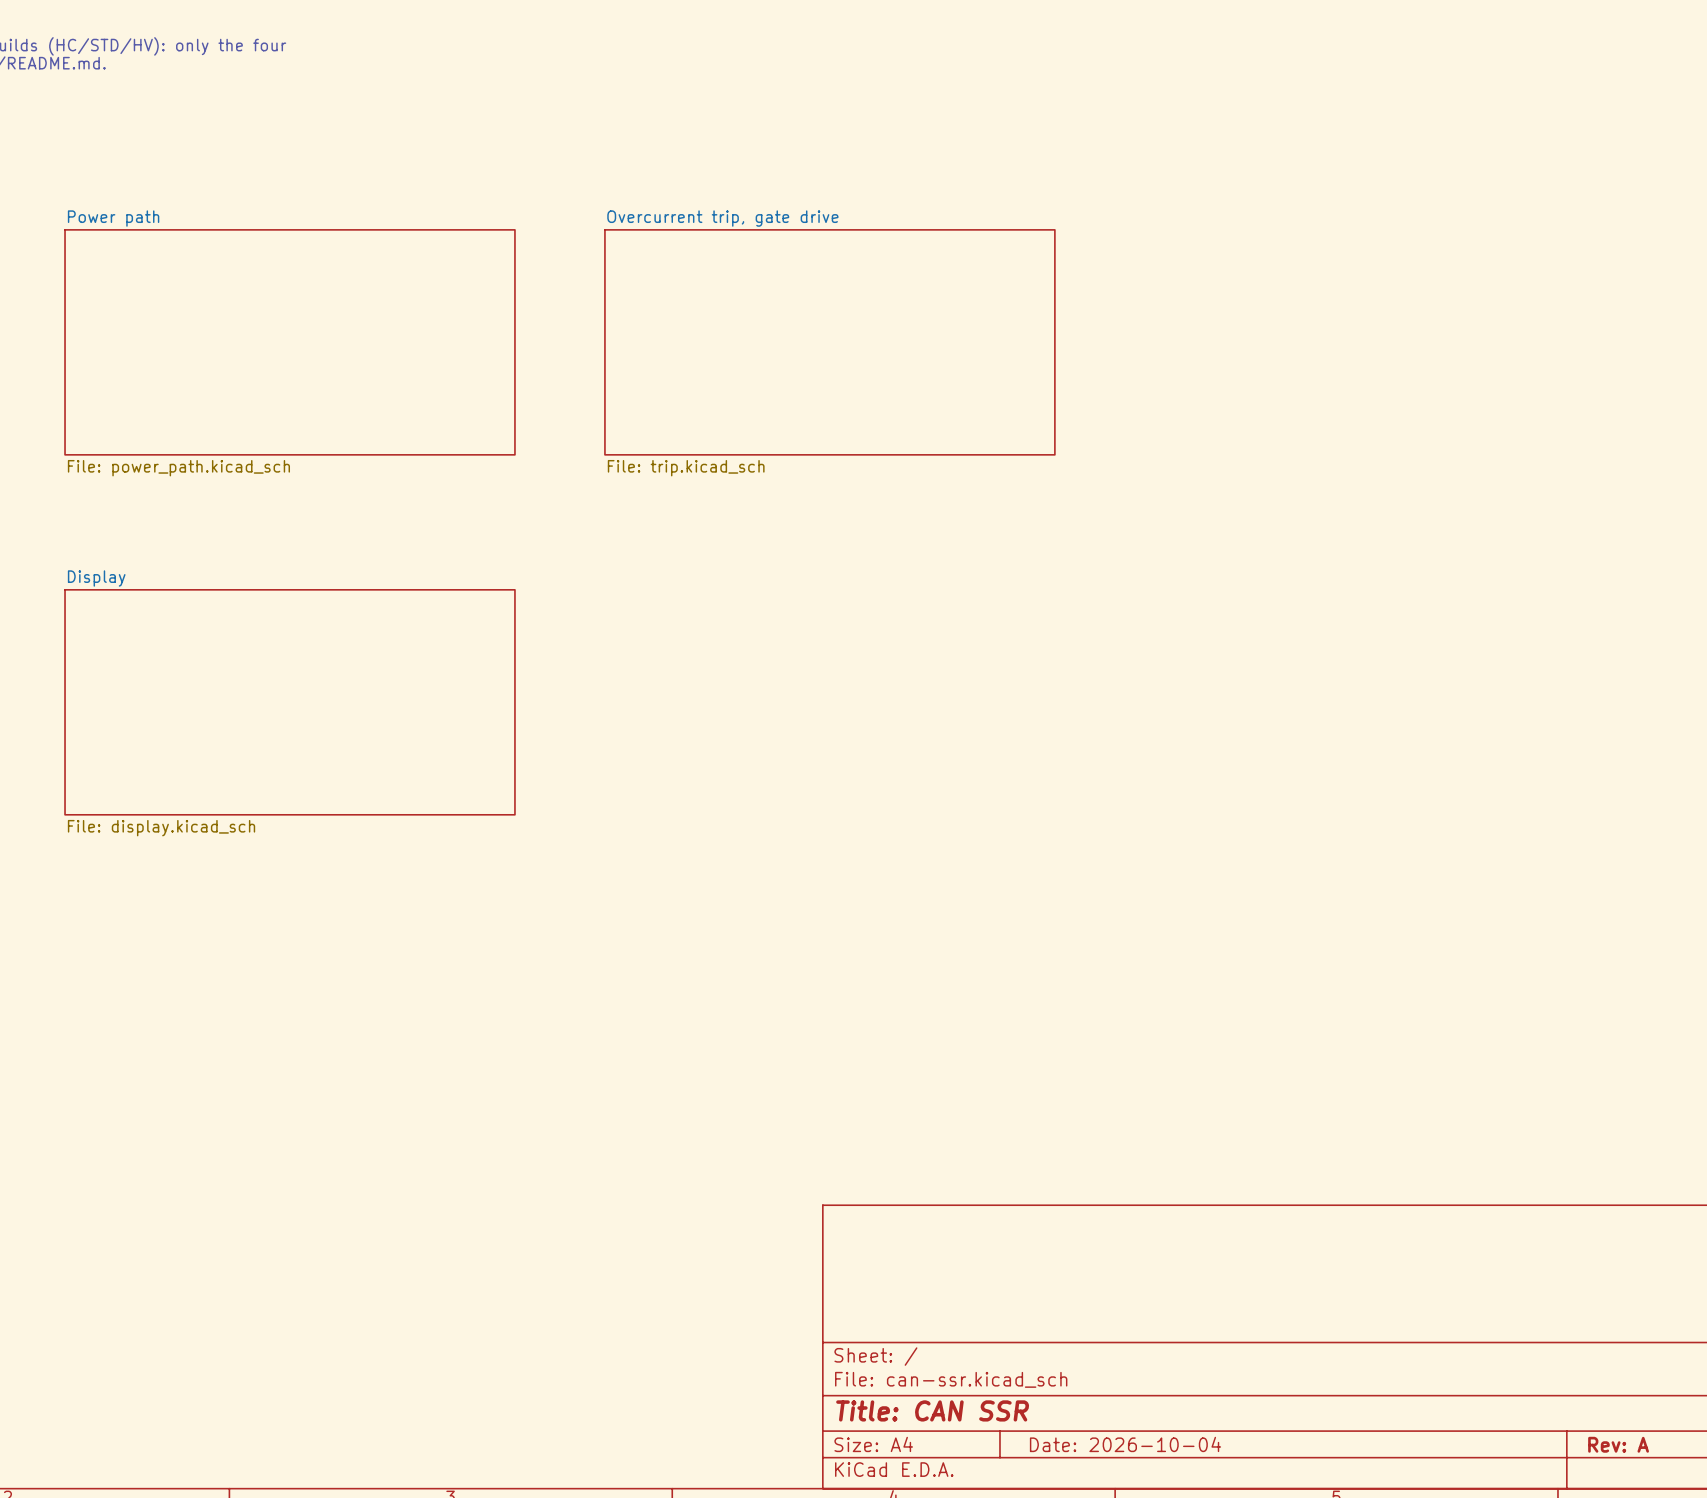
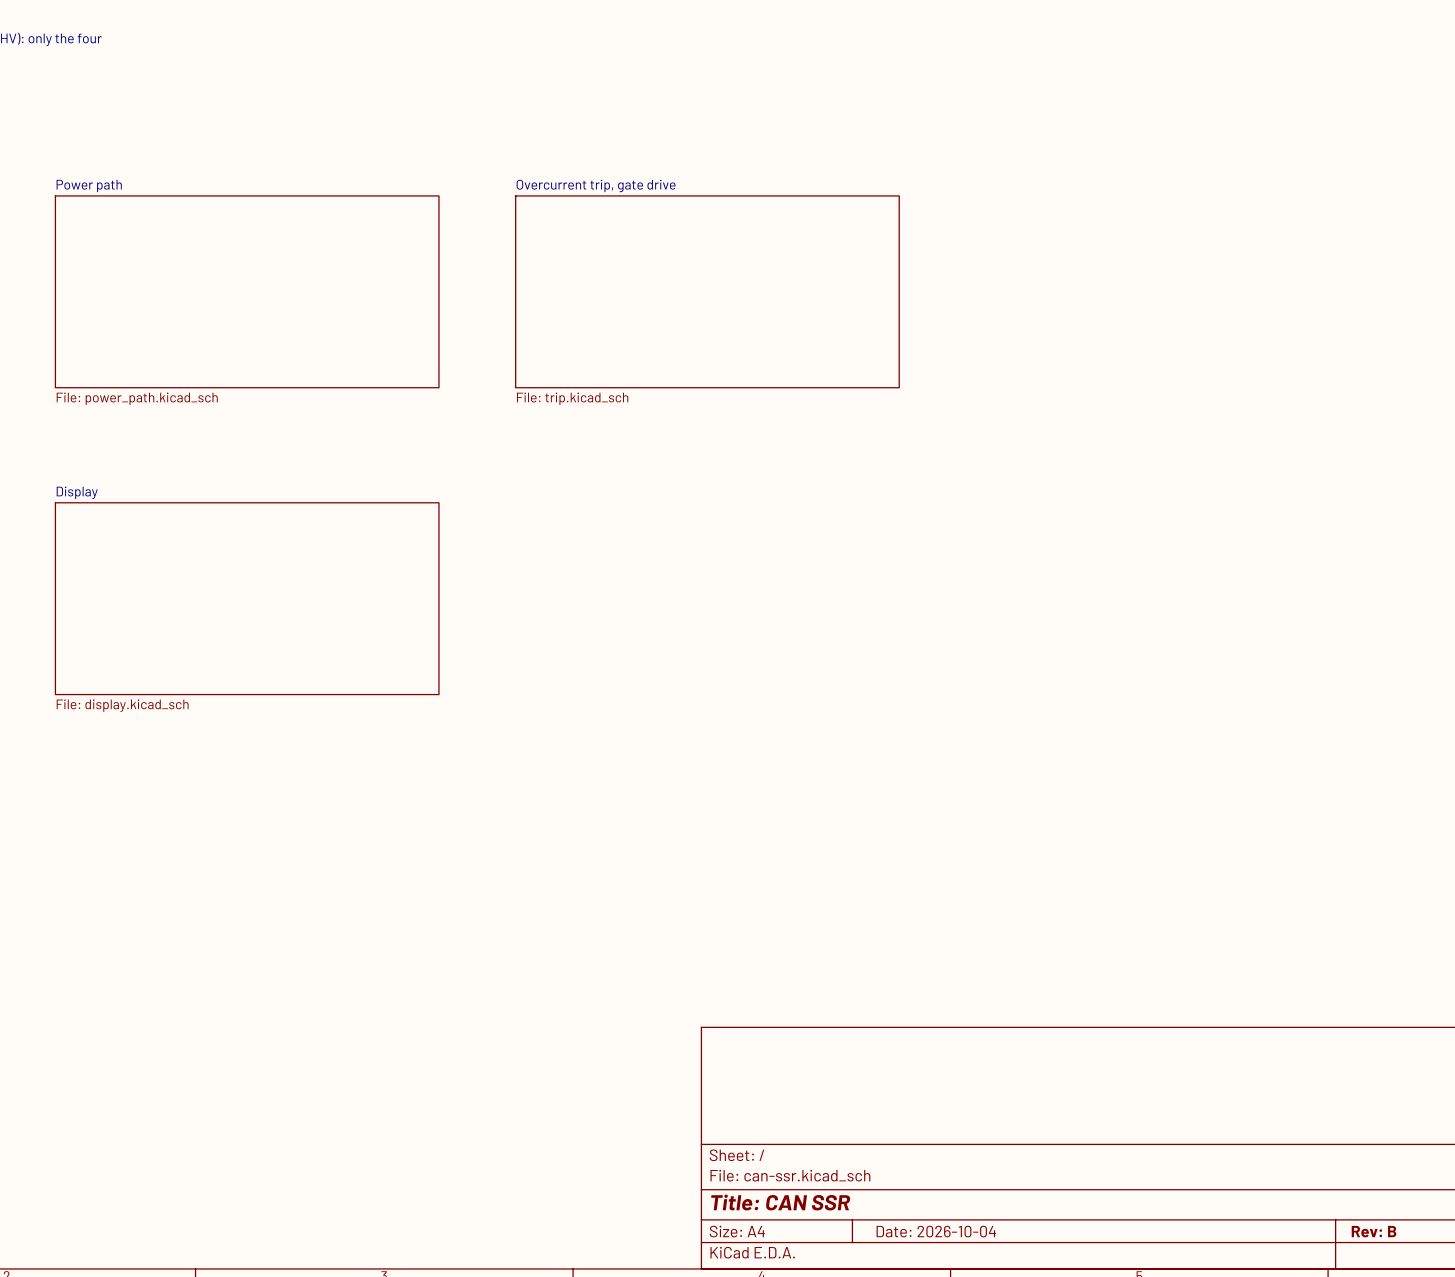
title block: Rev: A (1618, 1444) -> Rev: B (1373, 1231)

